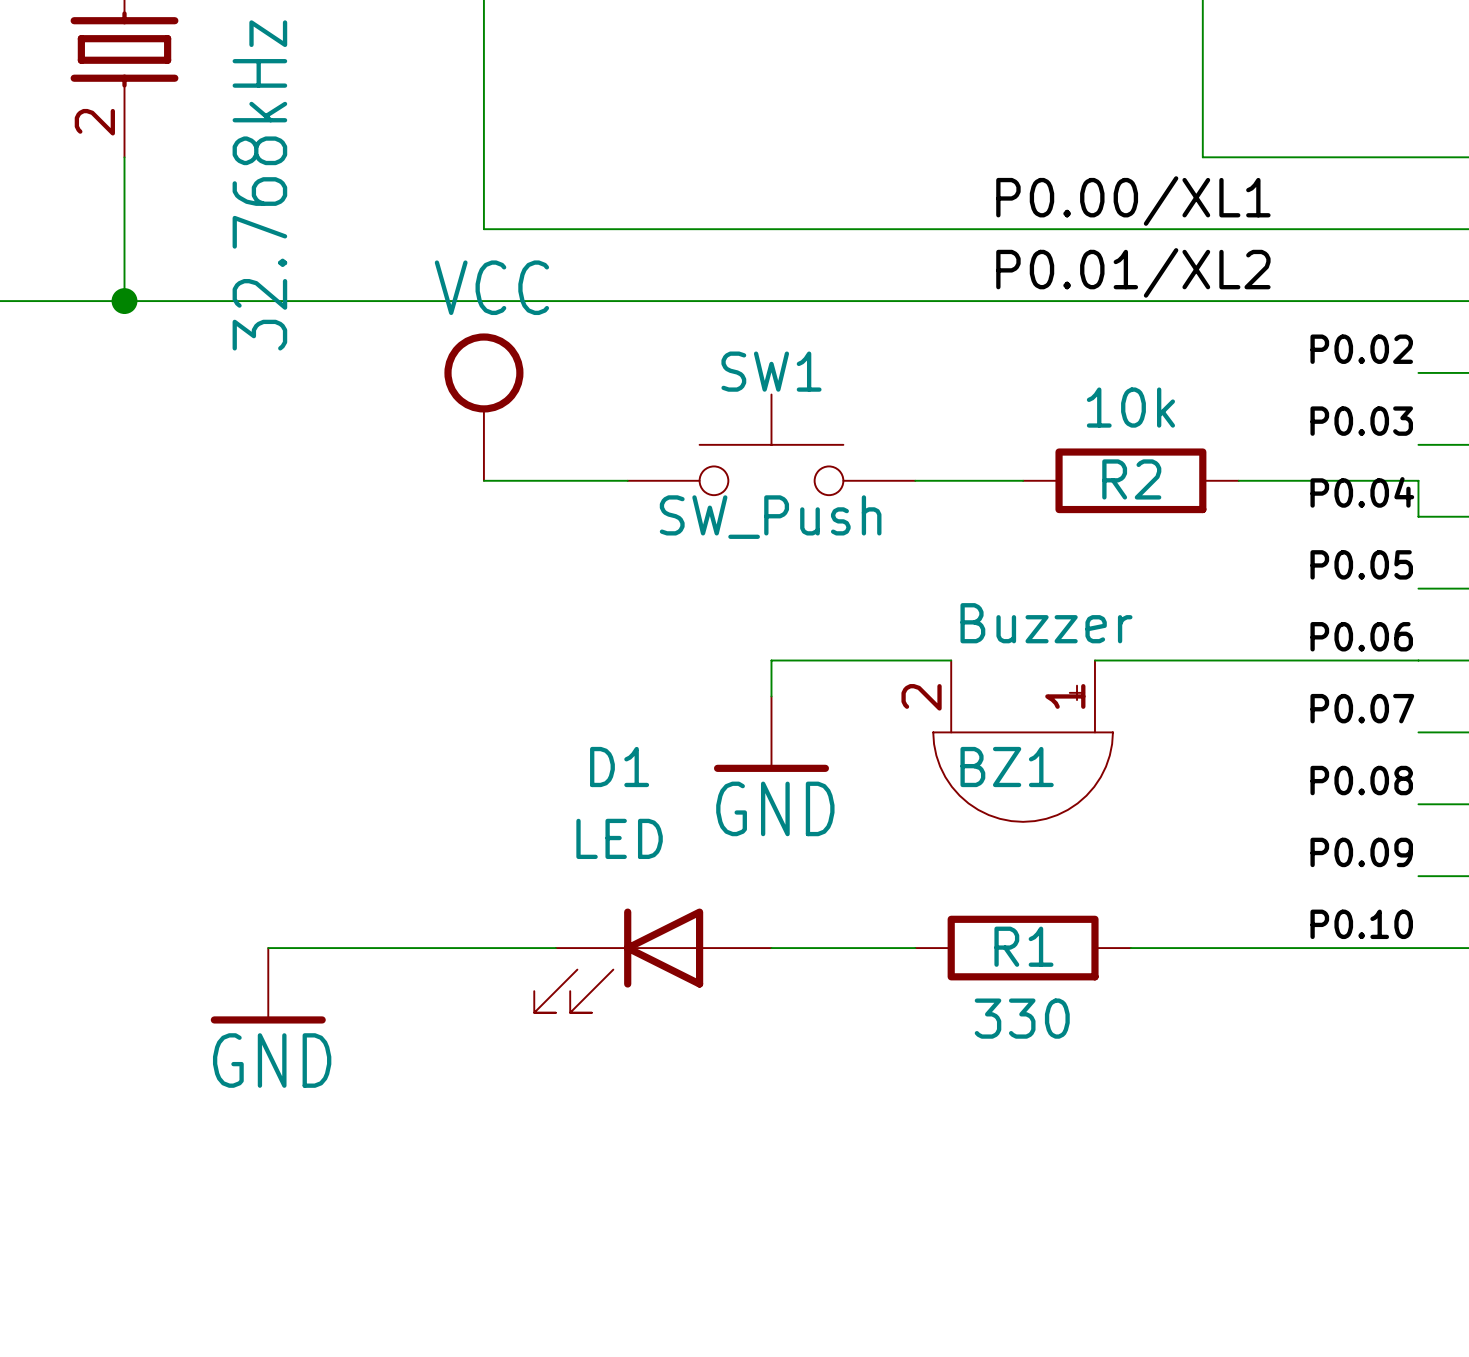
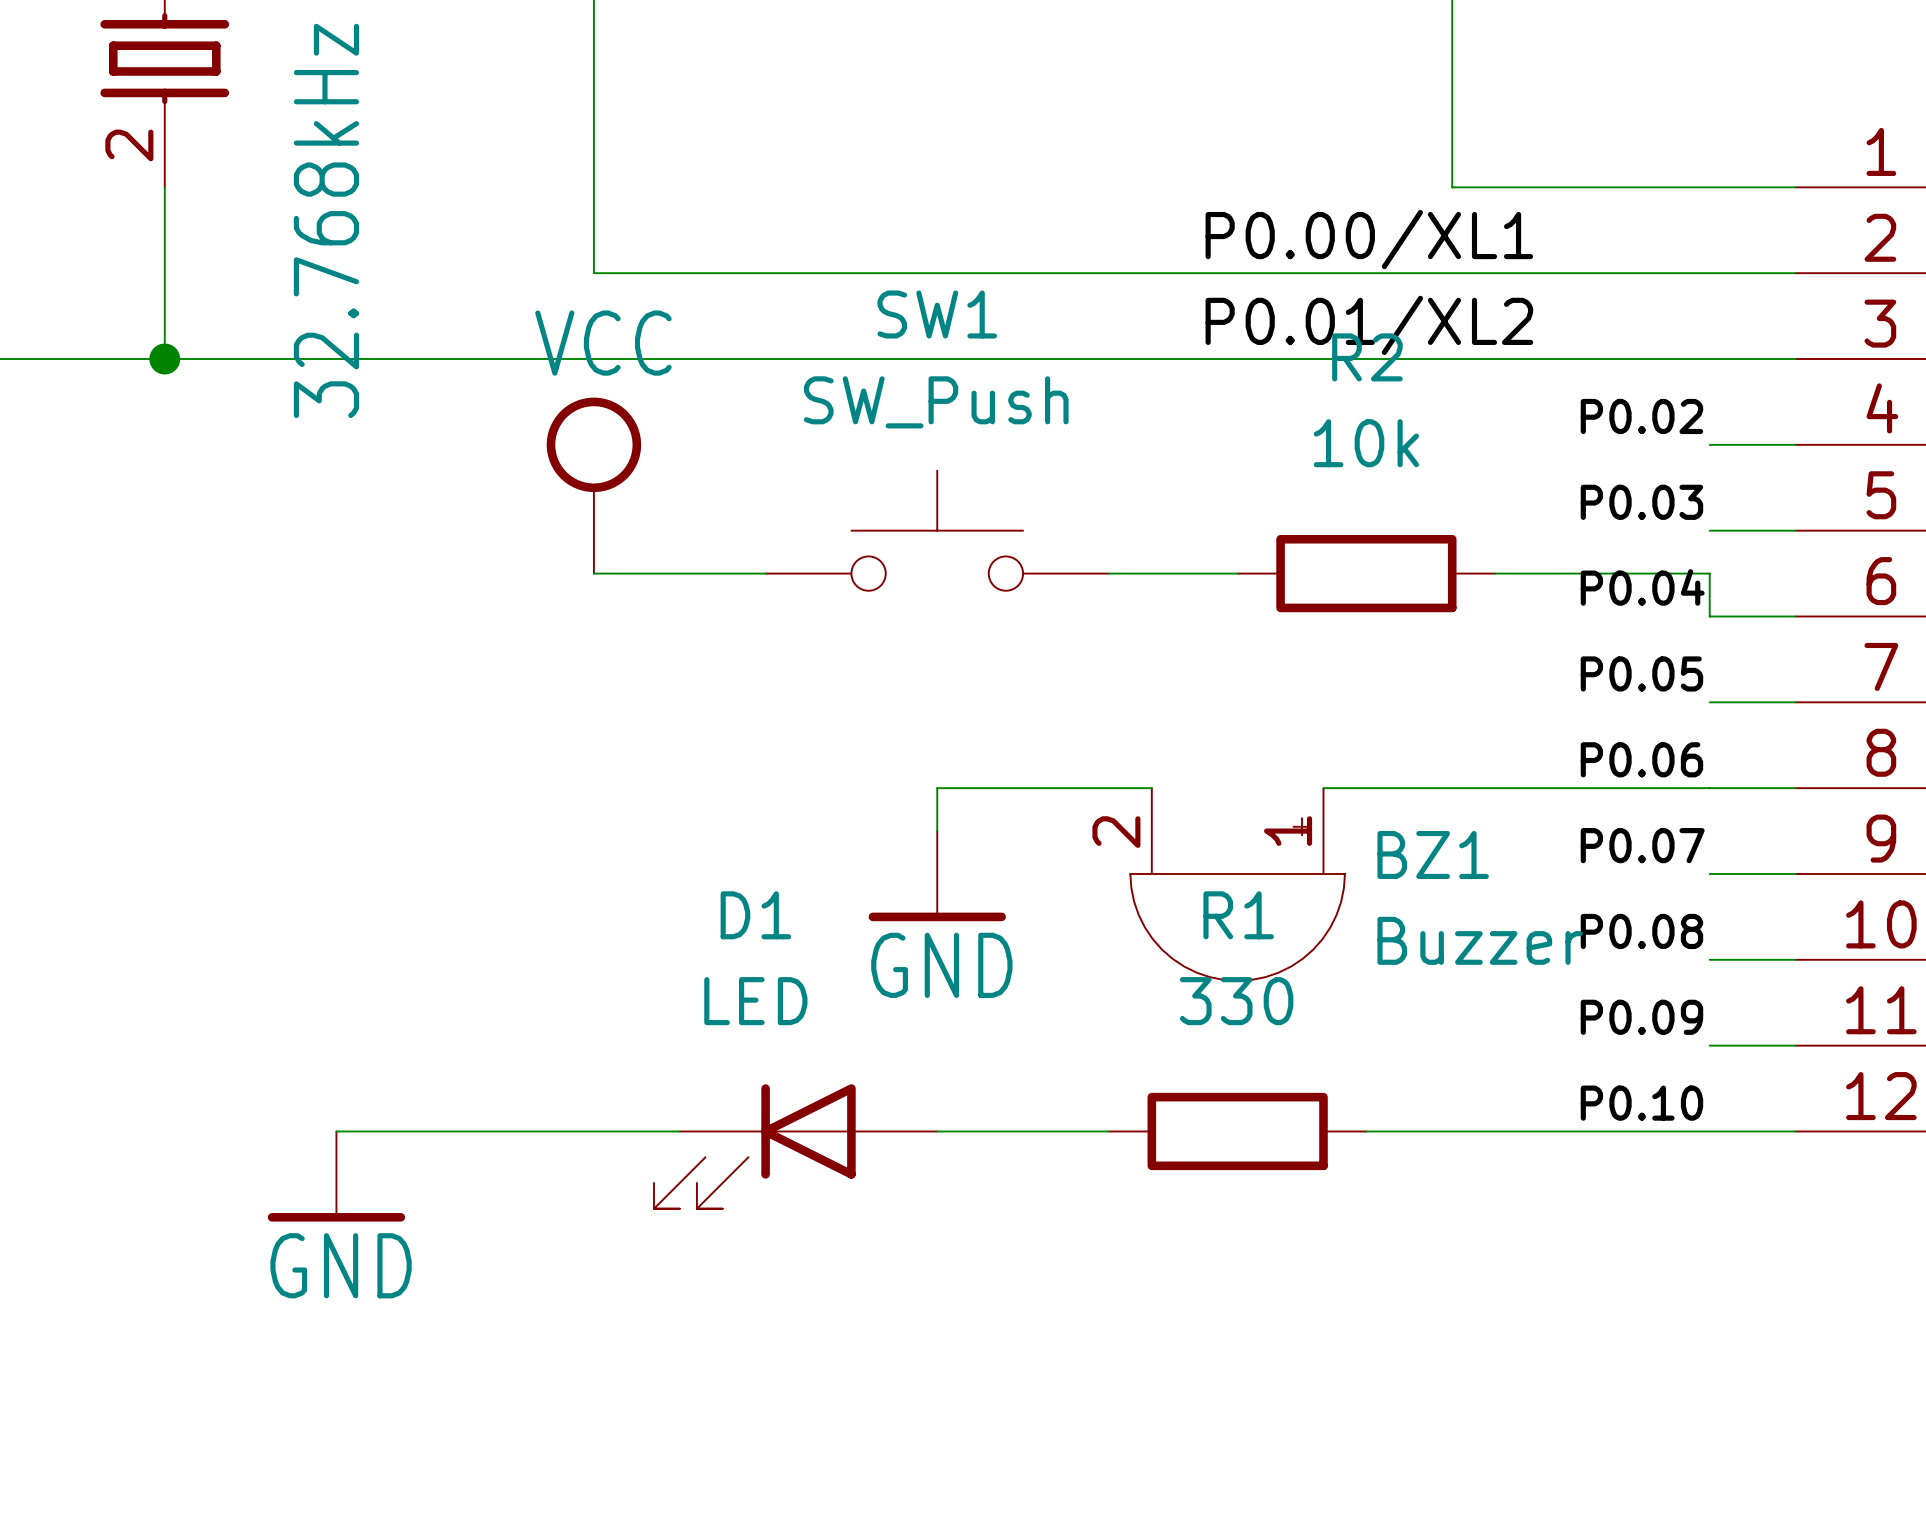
SW1 name position: SW1 (771, 371) -> SW1 (937, 314)
R2 value position: 10k (1130, 407) -> 10k (1366, 443)
R2 name position: R2 (1131, 479) -> R2 (1367, 357)
SW1 value position: SW_Push (770, 517) -> SW_Push (936, 402)
BZ1 value position: Buzzer (1046, 623) -> Buzzer (1480, 940)
BZ1 name position: BZ1 (1007, 767) -> BZ1 (1433, 854)
R1 name position: R1 (1023, 946) -> R1 (1238, 915)
R1 value position: 330 (1022, 1018) -> 330 (1236, 1001)

